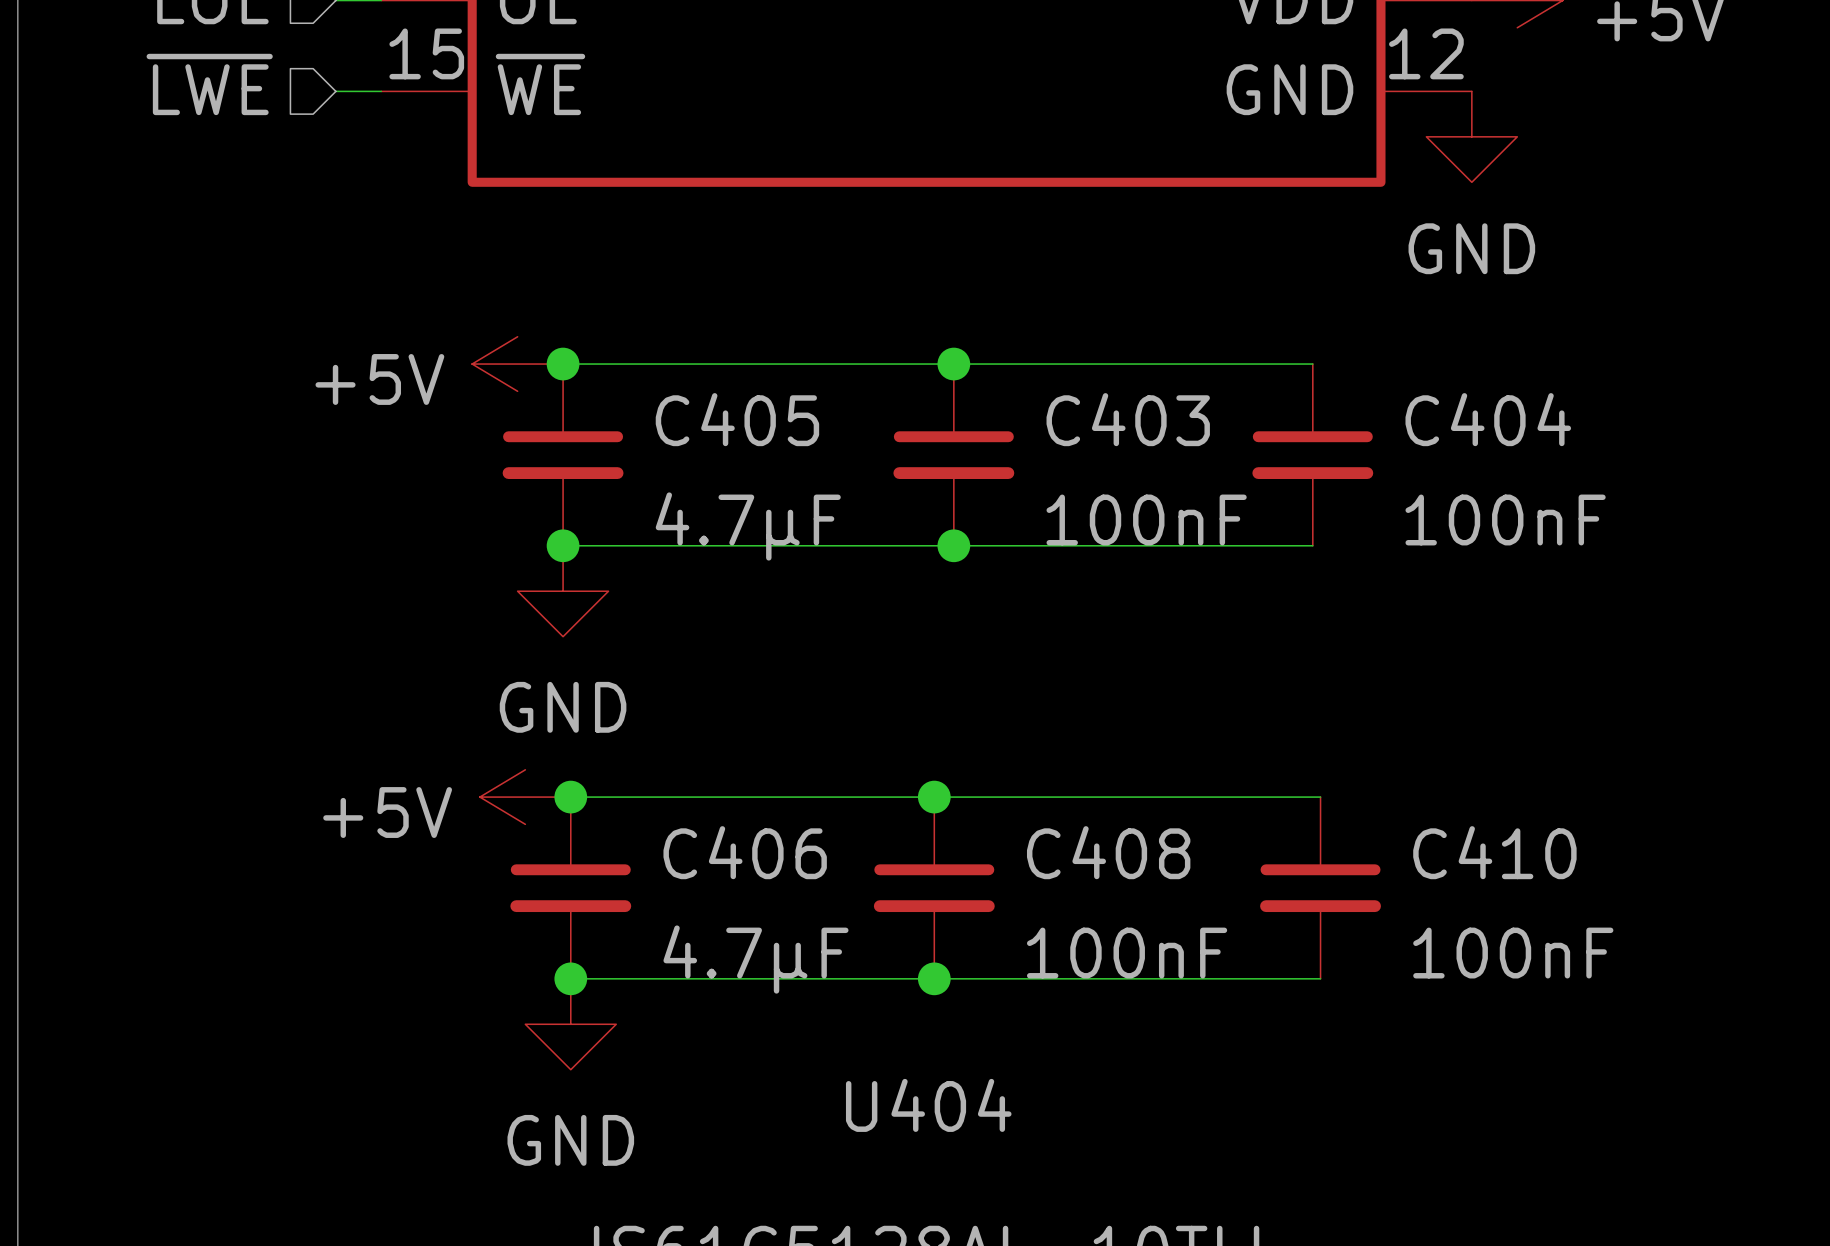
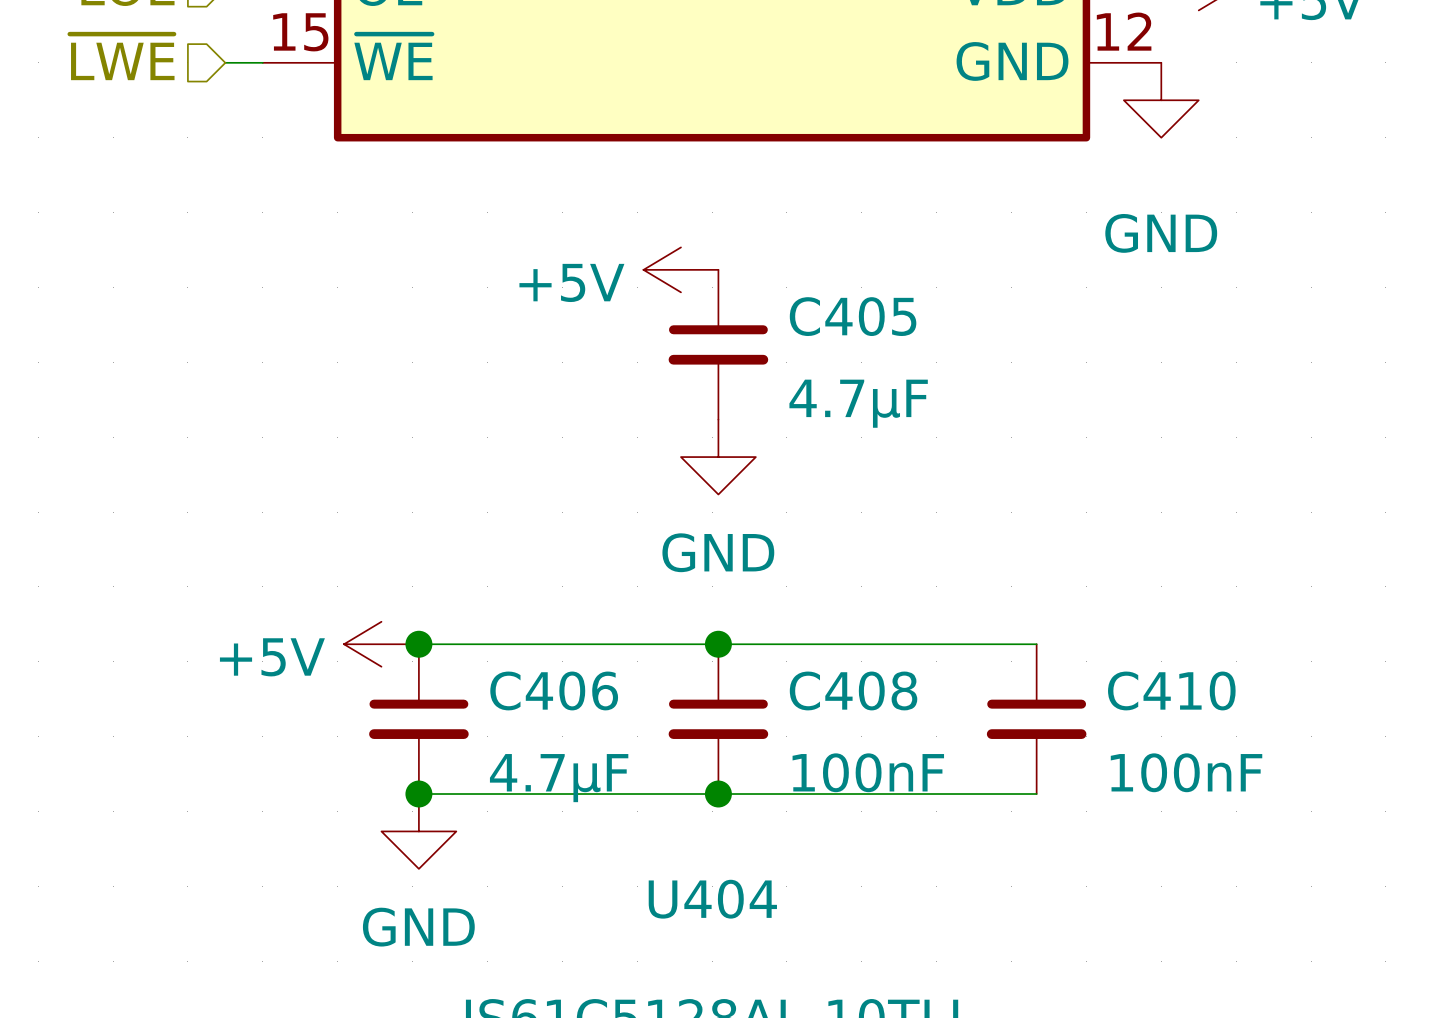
power symbol text position: GND (1471, 248) -> GND (1161, 233)
power symbol position: +5V (517, 364) -> +5V (680, 269)
wire: (563, 364) (1312, 364) -> none
junction: (563, 364) -> none
junction: (953, 364) -> none
C405 position: (563, 454) -> (718, 344)
C403: 100nF (953, 454) -> none
C404: 100nF (1312, 454) -> none
wire: (563, 545) (1312, 545) -> none
junction: (563, 545) -> none
junction: (953, 545) -> none
power symbol position: GND (563, 591) -> GND (718, 457)

